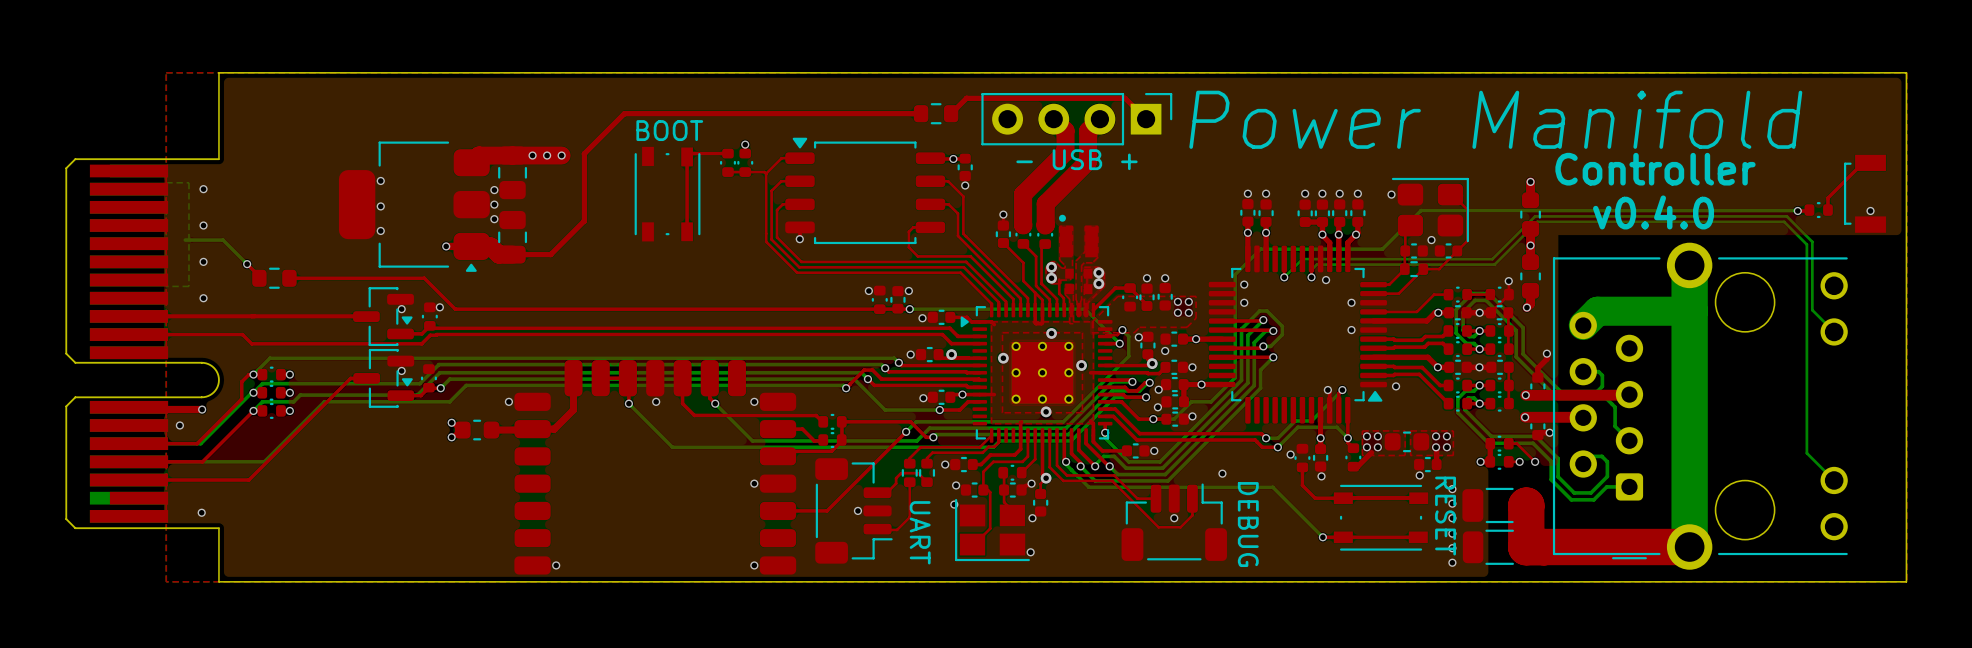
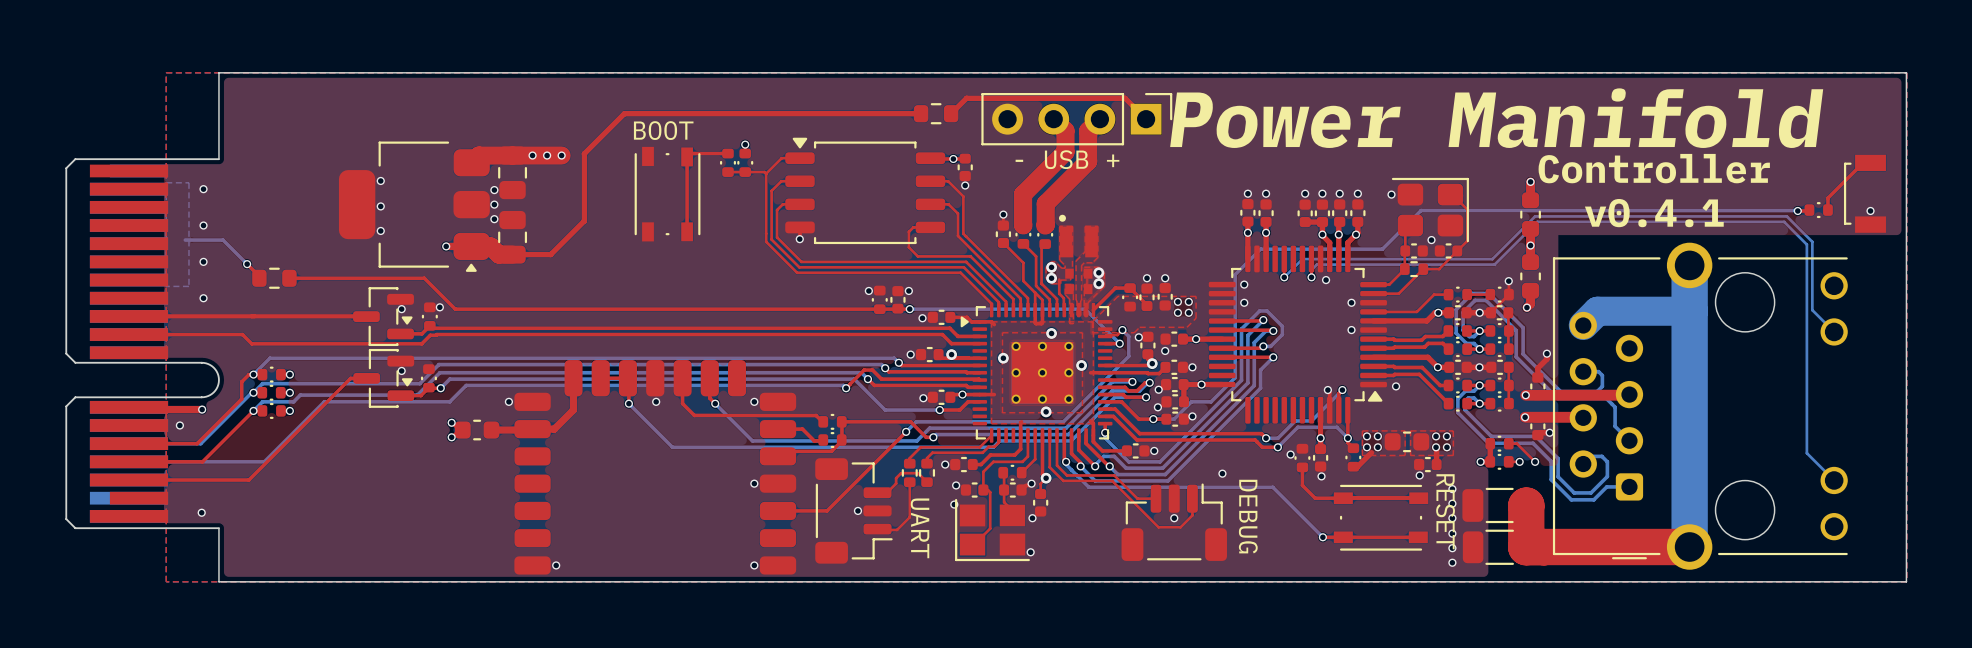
text: v0.4.0 (1653, 212) -> v0.4.1 (1654, 213)

